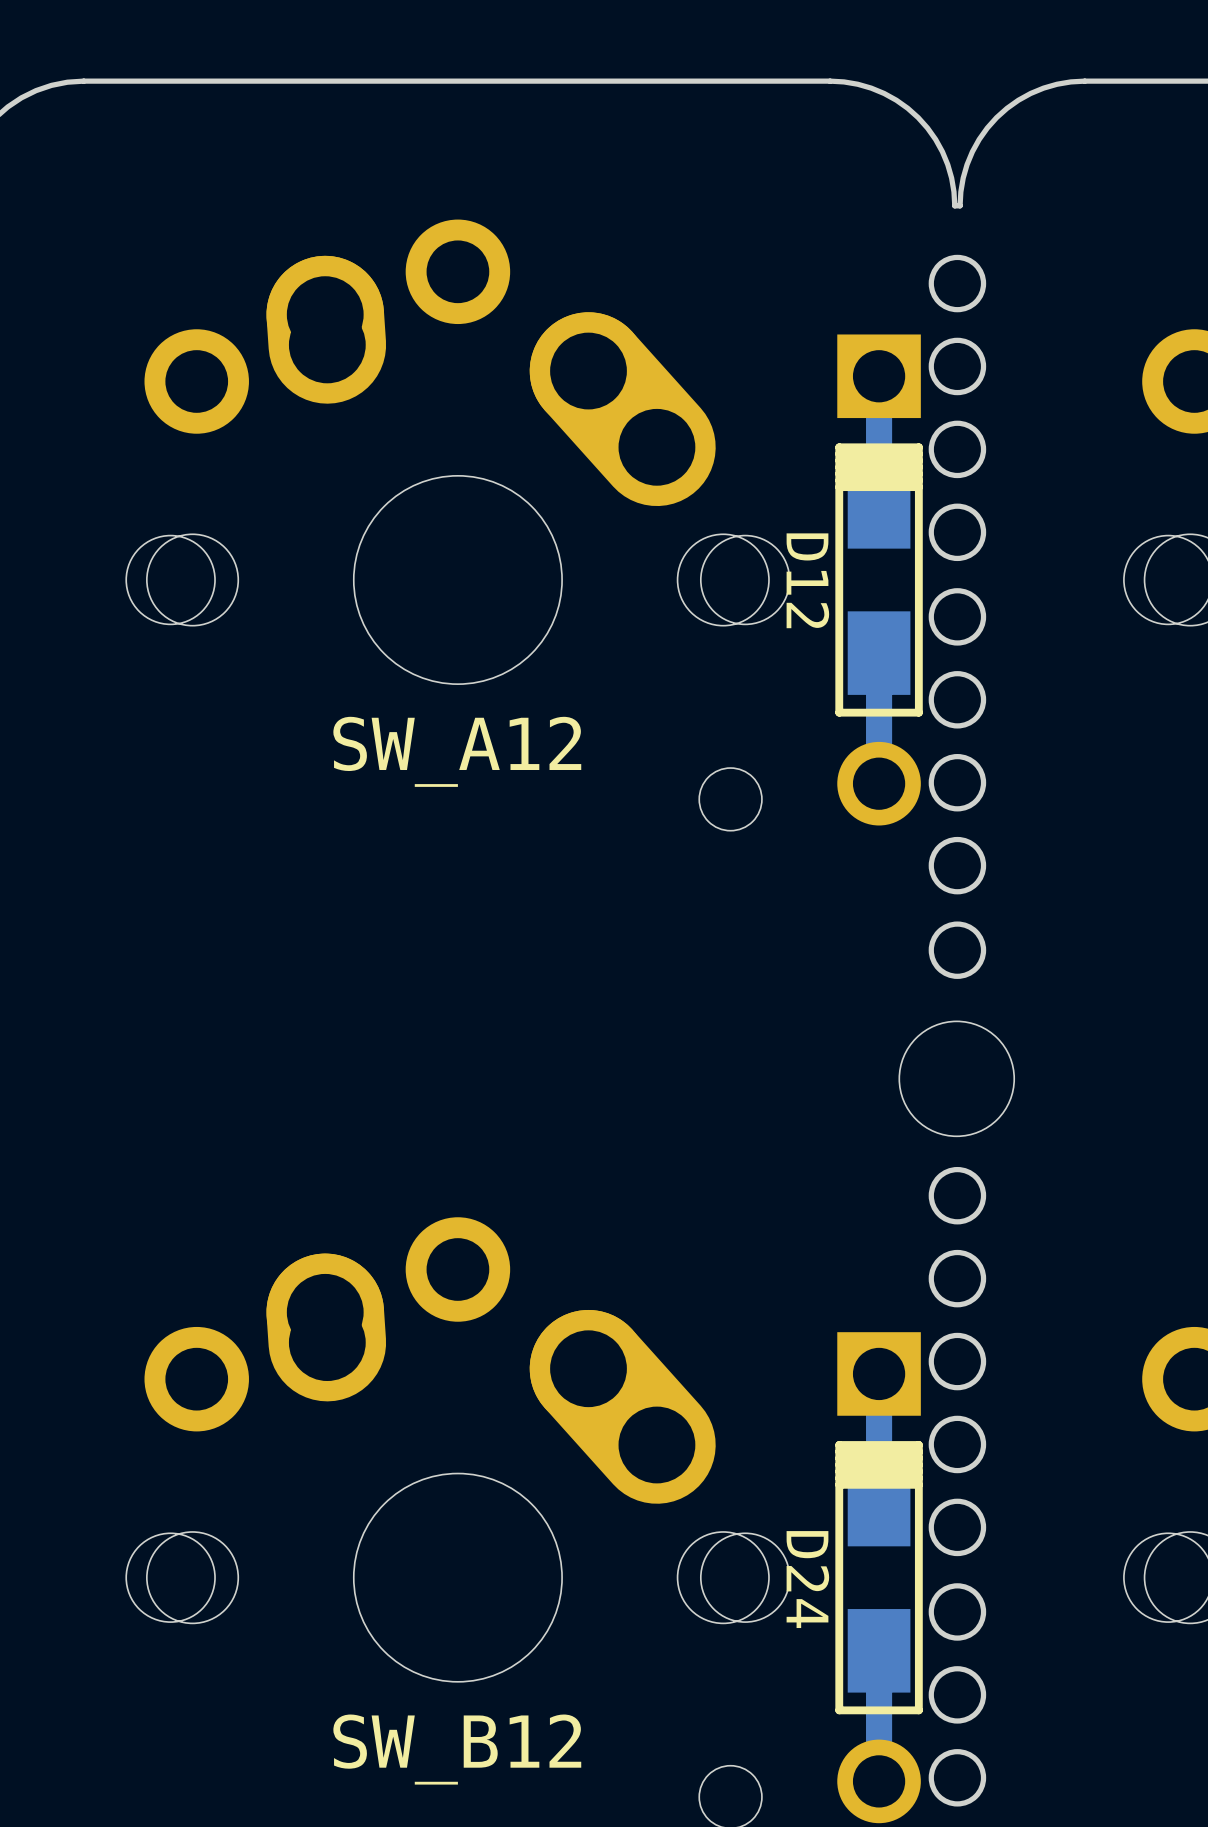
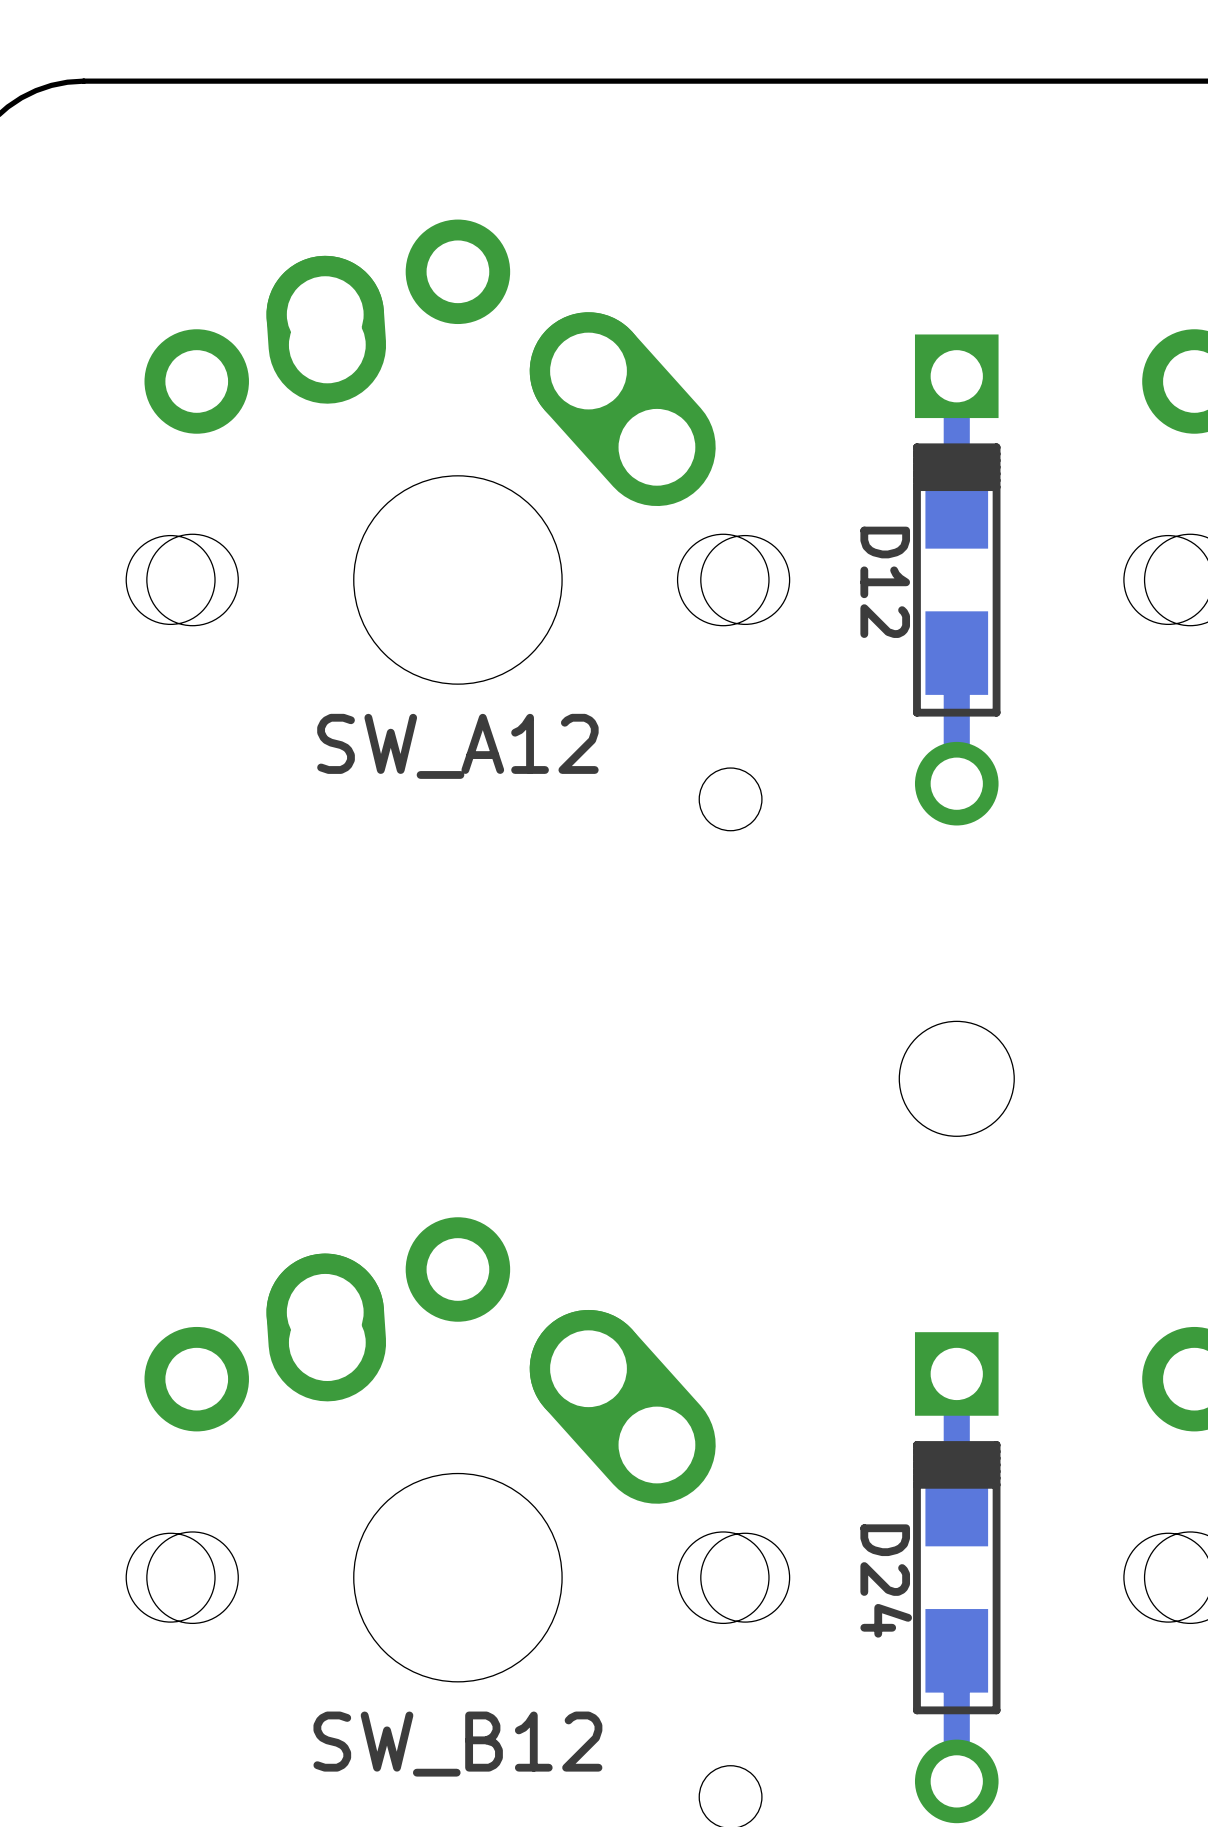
board edge: (1084, 81) (1057, 84) (1030, 93) (1018, 100) (996, 117) (979, 139) (967, 164) (960, 191) (960, 205) (954, 205) (951, 178) (942, 151) (935, 139) (918, 117) (896, 100) (871, 88) (844, 81) (830, 81) -> (1084, 81) (830, 81)
round board edge: [928, 254, 987, 313] -> none
round board edge: [928, 337, 987, 396] -> none
round board edge: [928, 420, 987, 479] -> none
round board edge: [928, 503, 987, 562] -> none
D12 position: (879, 579) -> (956, 579)
round board edge: [928, 588, 987, 646] -> none
round board edge: [928, 671, 987, 729] -> none
round board edge: [928, 753, 987, 812] -> none
round board edge: [928, 836, 987, 895] -> none
round board edge: [928, 921, 987, 979] -> none
round board edge: [928, 1166, 987, 1225] -> none
round board edge: [928, 1249, 987, 1308] -> none
round board edge: [928, 1332, 987, 1391] -> none
round board edge: [928, 1415, 987, 1474] -> none
round board edge: [928, 1498, 987, 1557] -> none
D24 position: (879, 1577) -> (956, 1577)
round board edge: [928, 1583, 987, 1641] -> none
round board edge: [928, 1666, 987, 1724] -> none
round board edge: [928, 1749, 987, 1807] -> none

